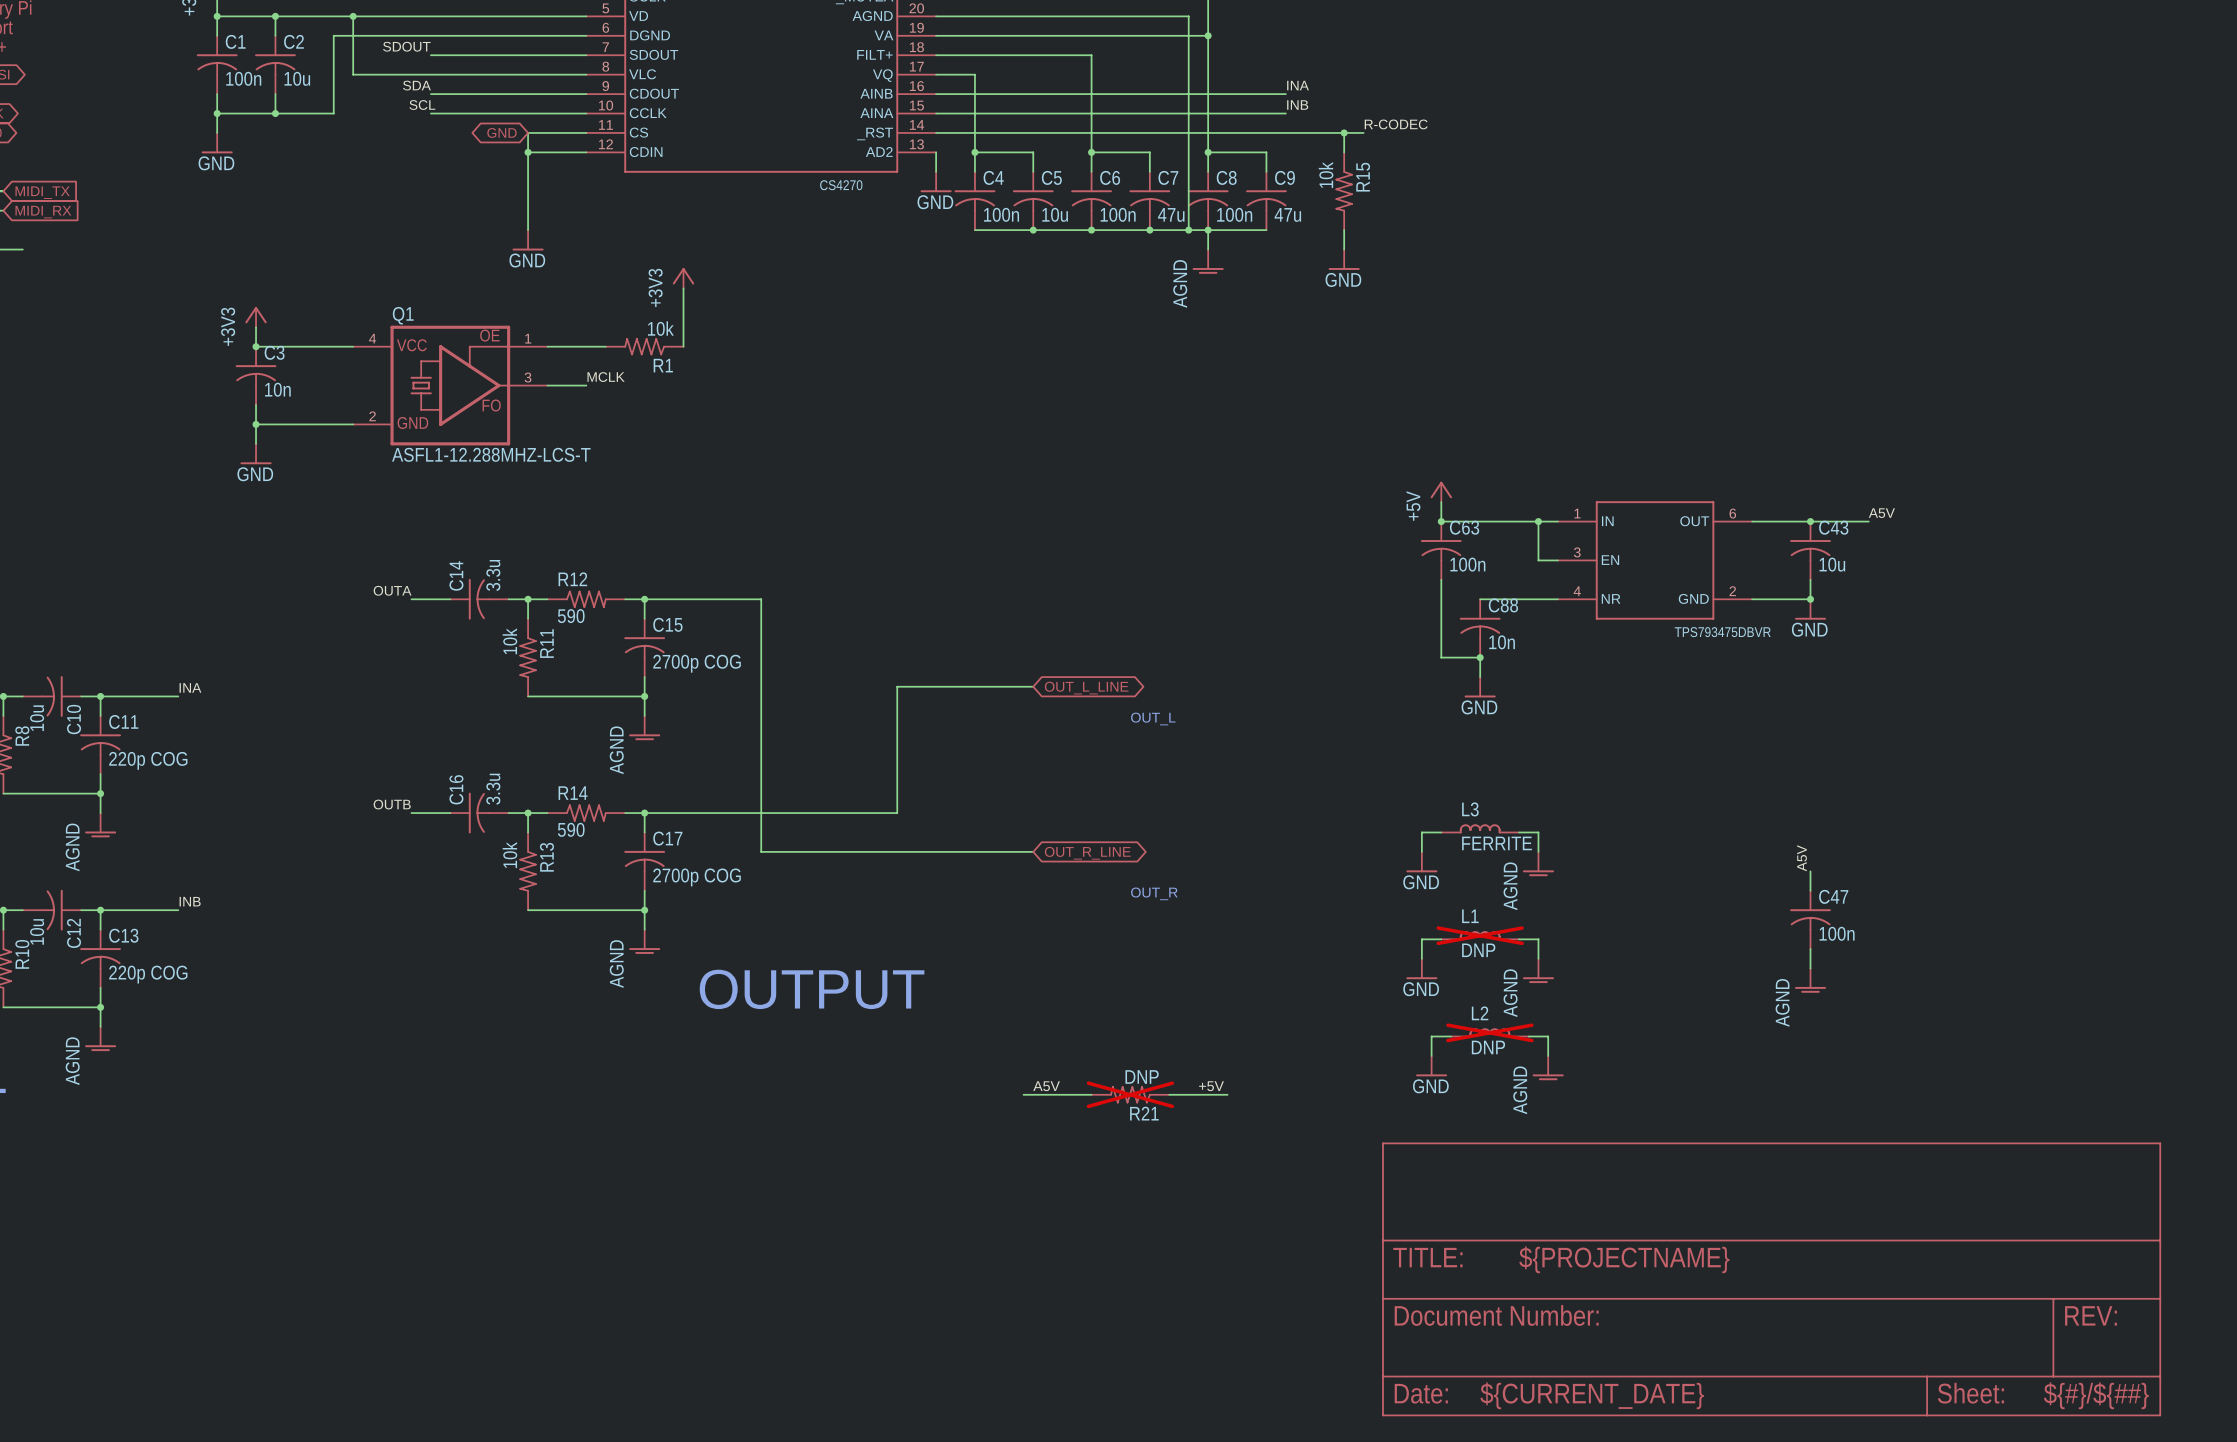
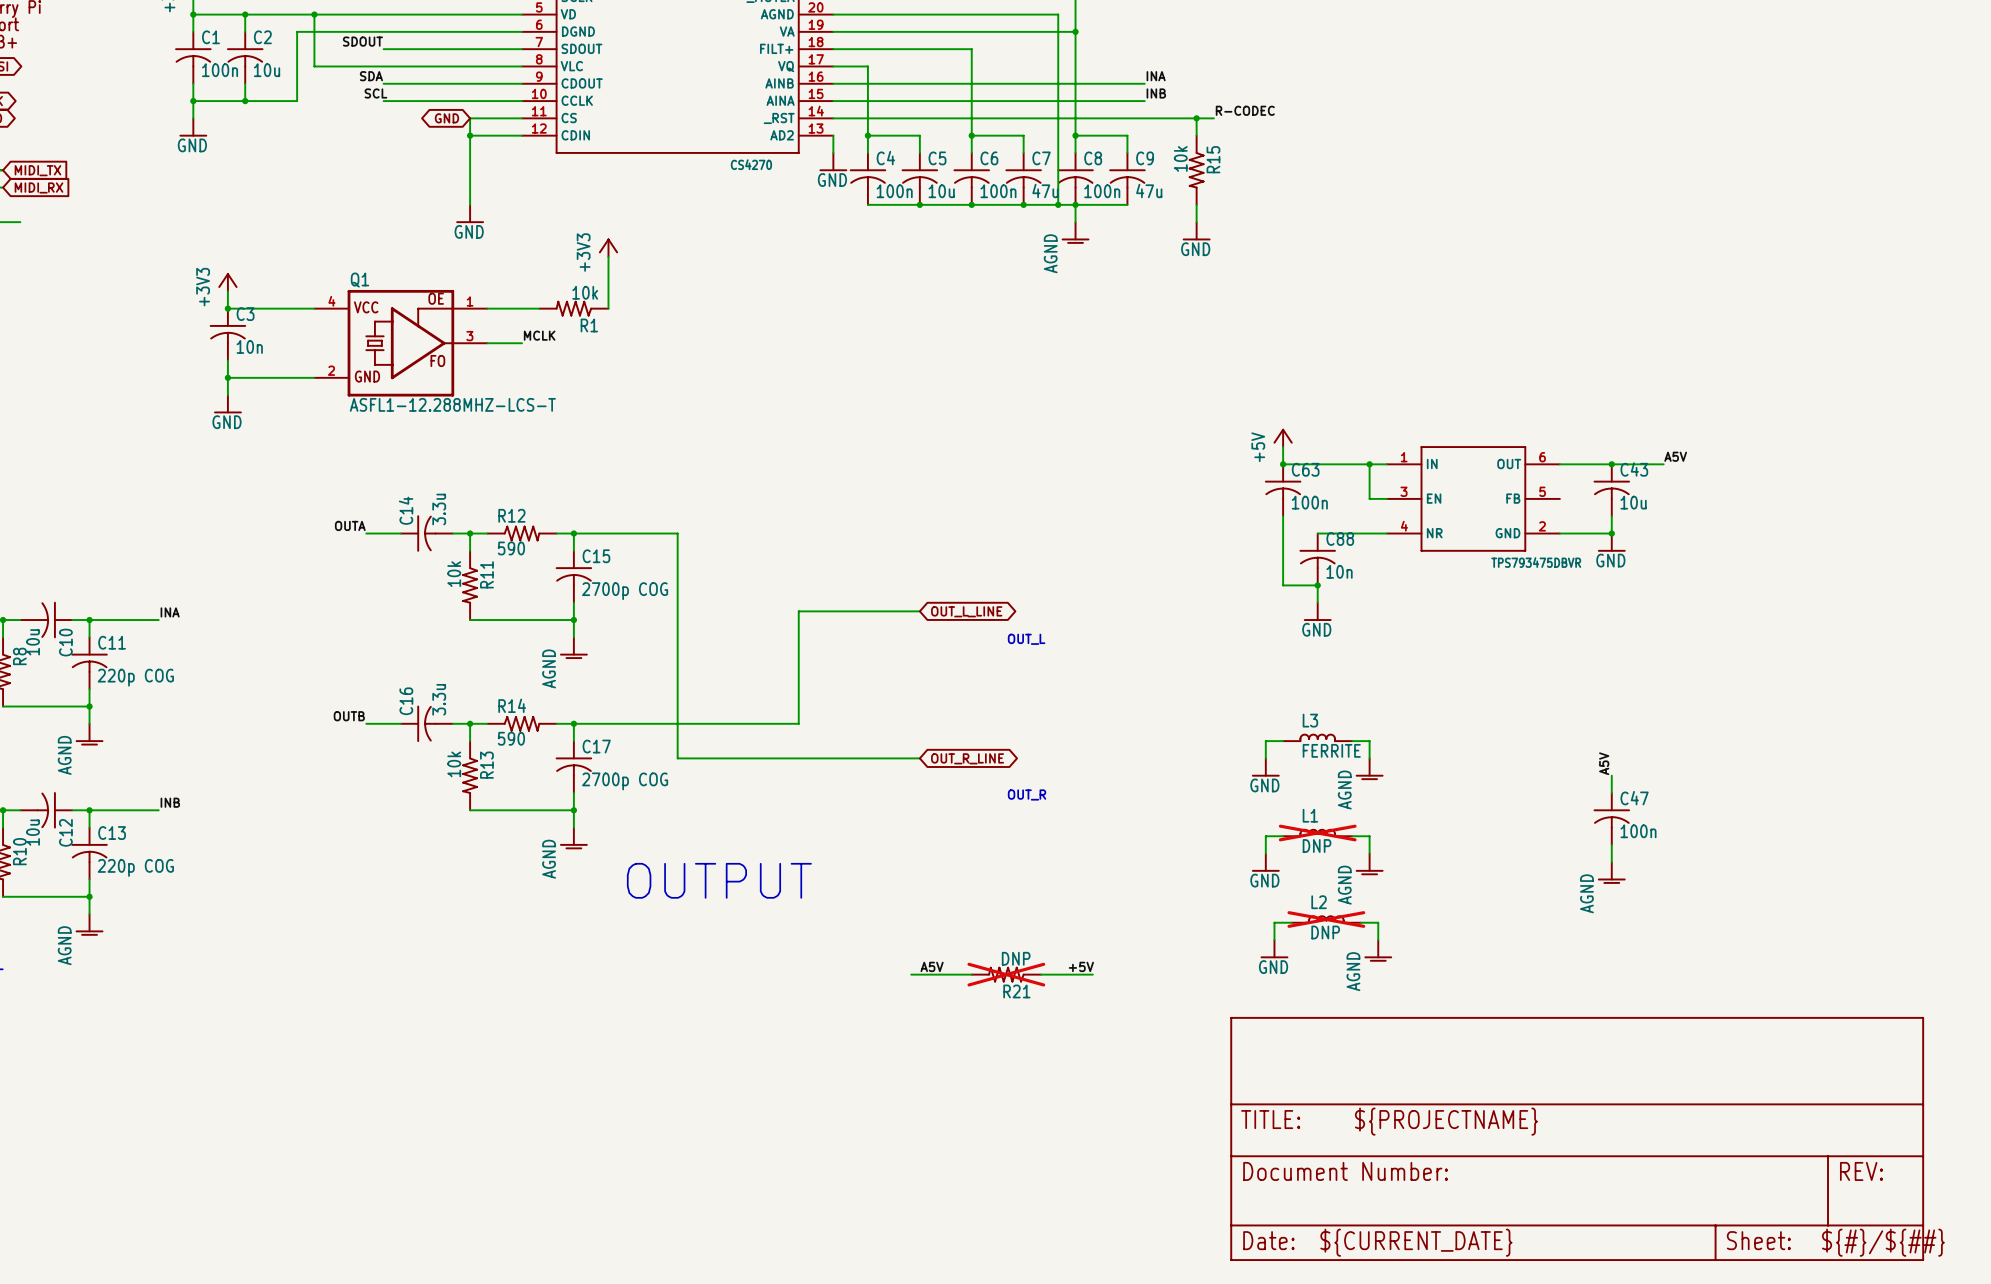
part symbol: [1557, 501, 1753, 620] -> [1386, 446, 1560, 552]

